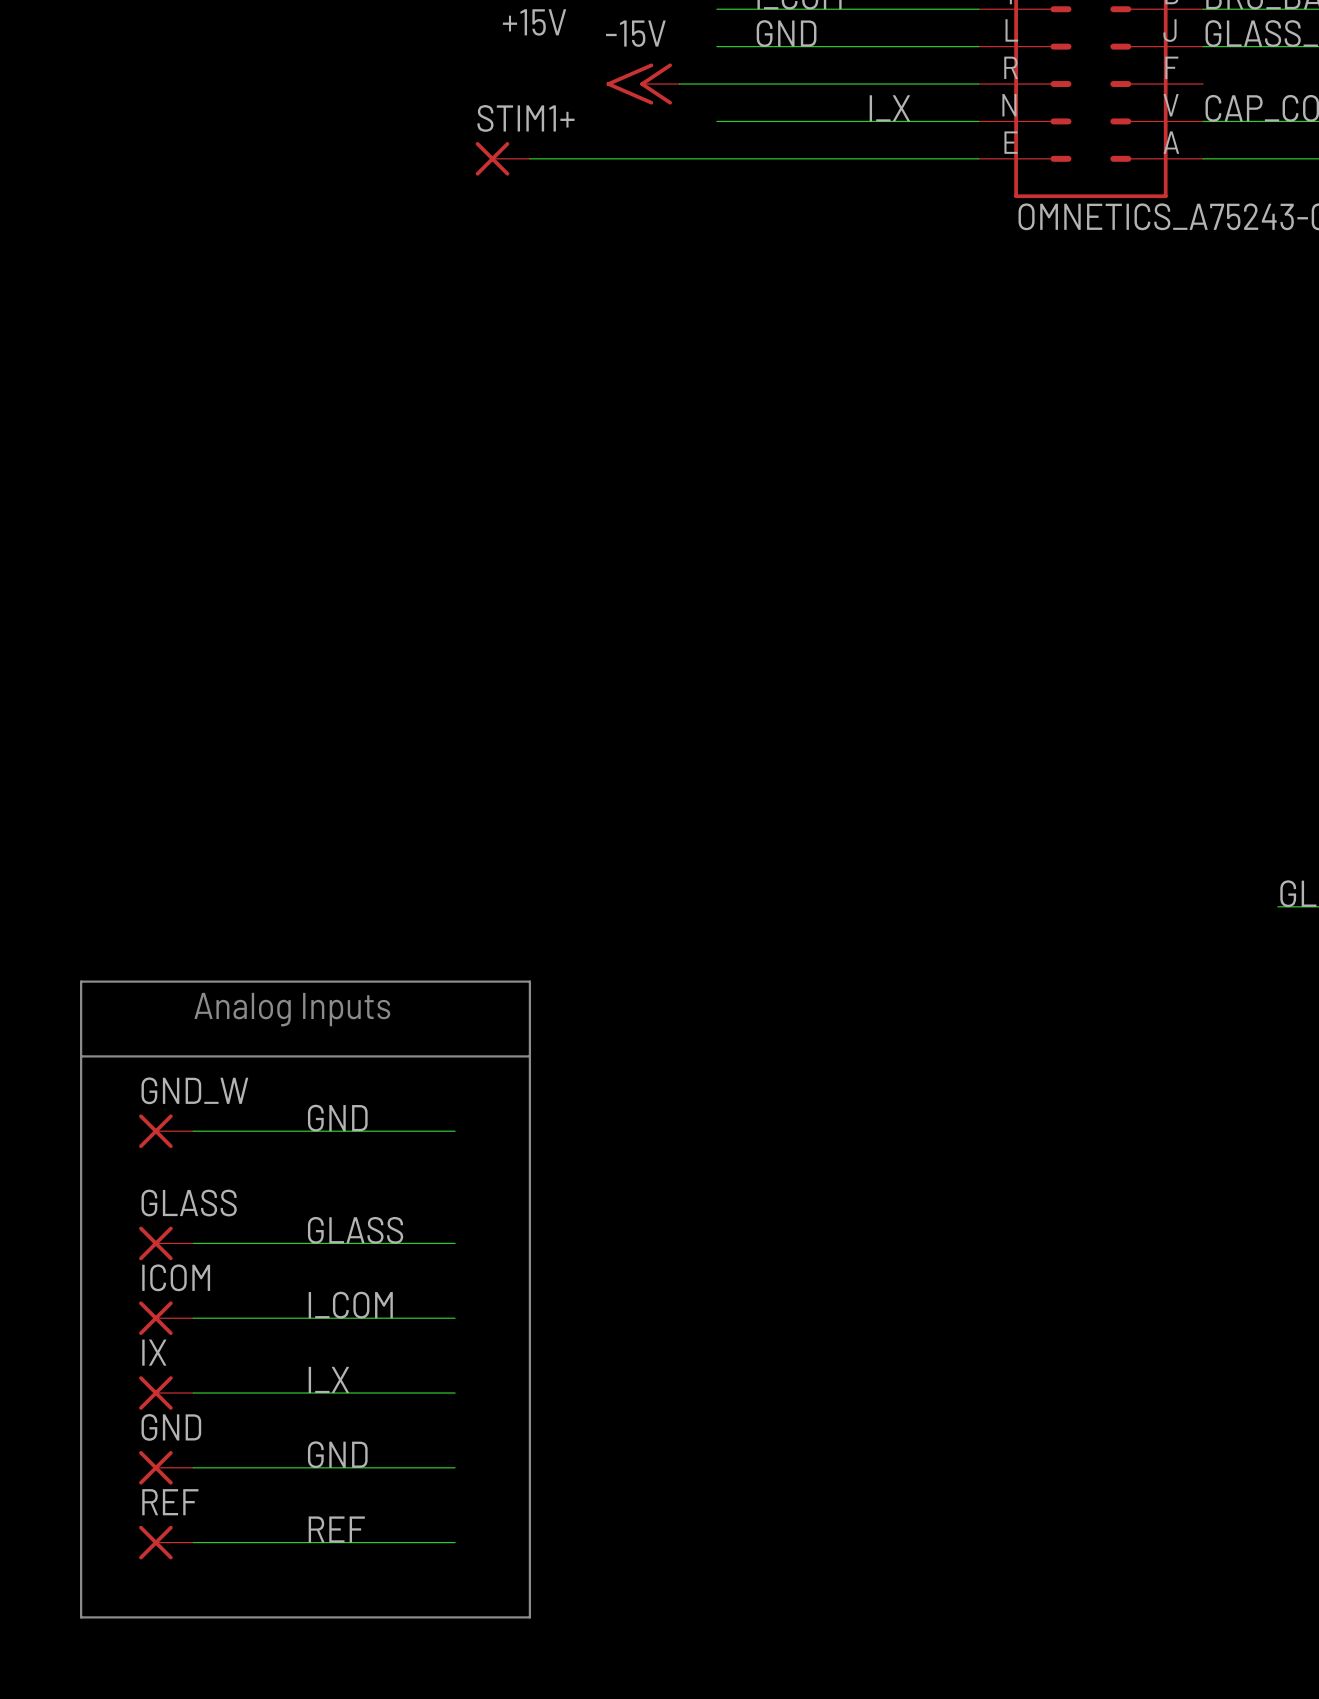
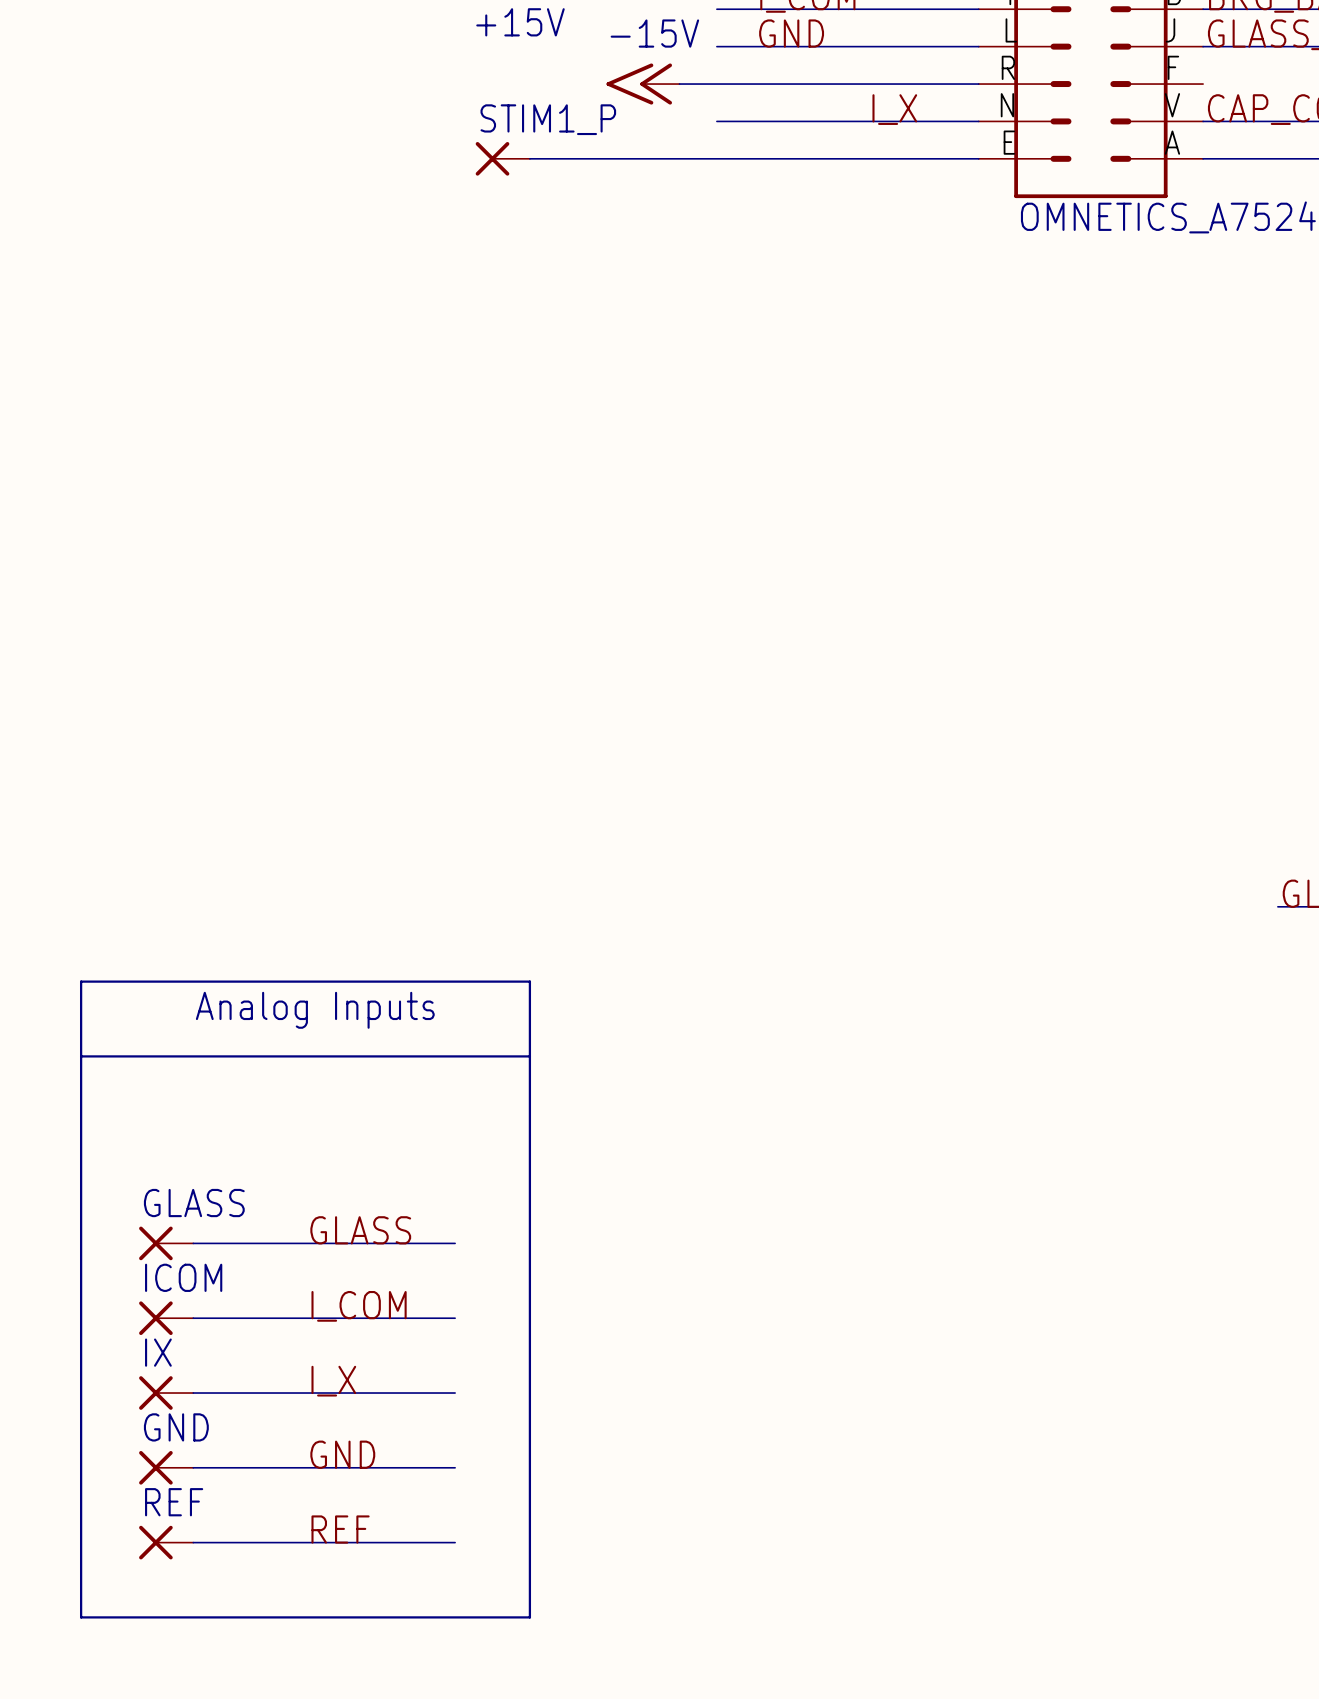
STIM1+ name: STIM1+ (526, 118) -> STIM1_P (548, 119)
label: GND (337, 1118) -> none
GND_W: (166, 1131) -> none
wire: (193, 1131) (455, 1131) -> none

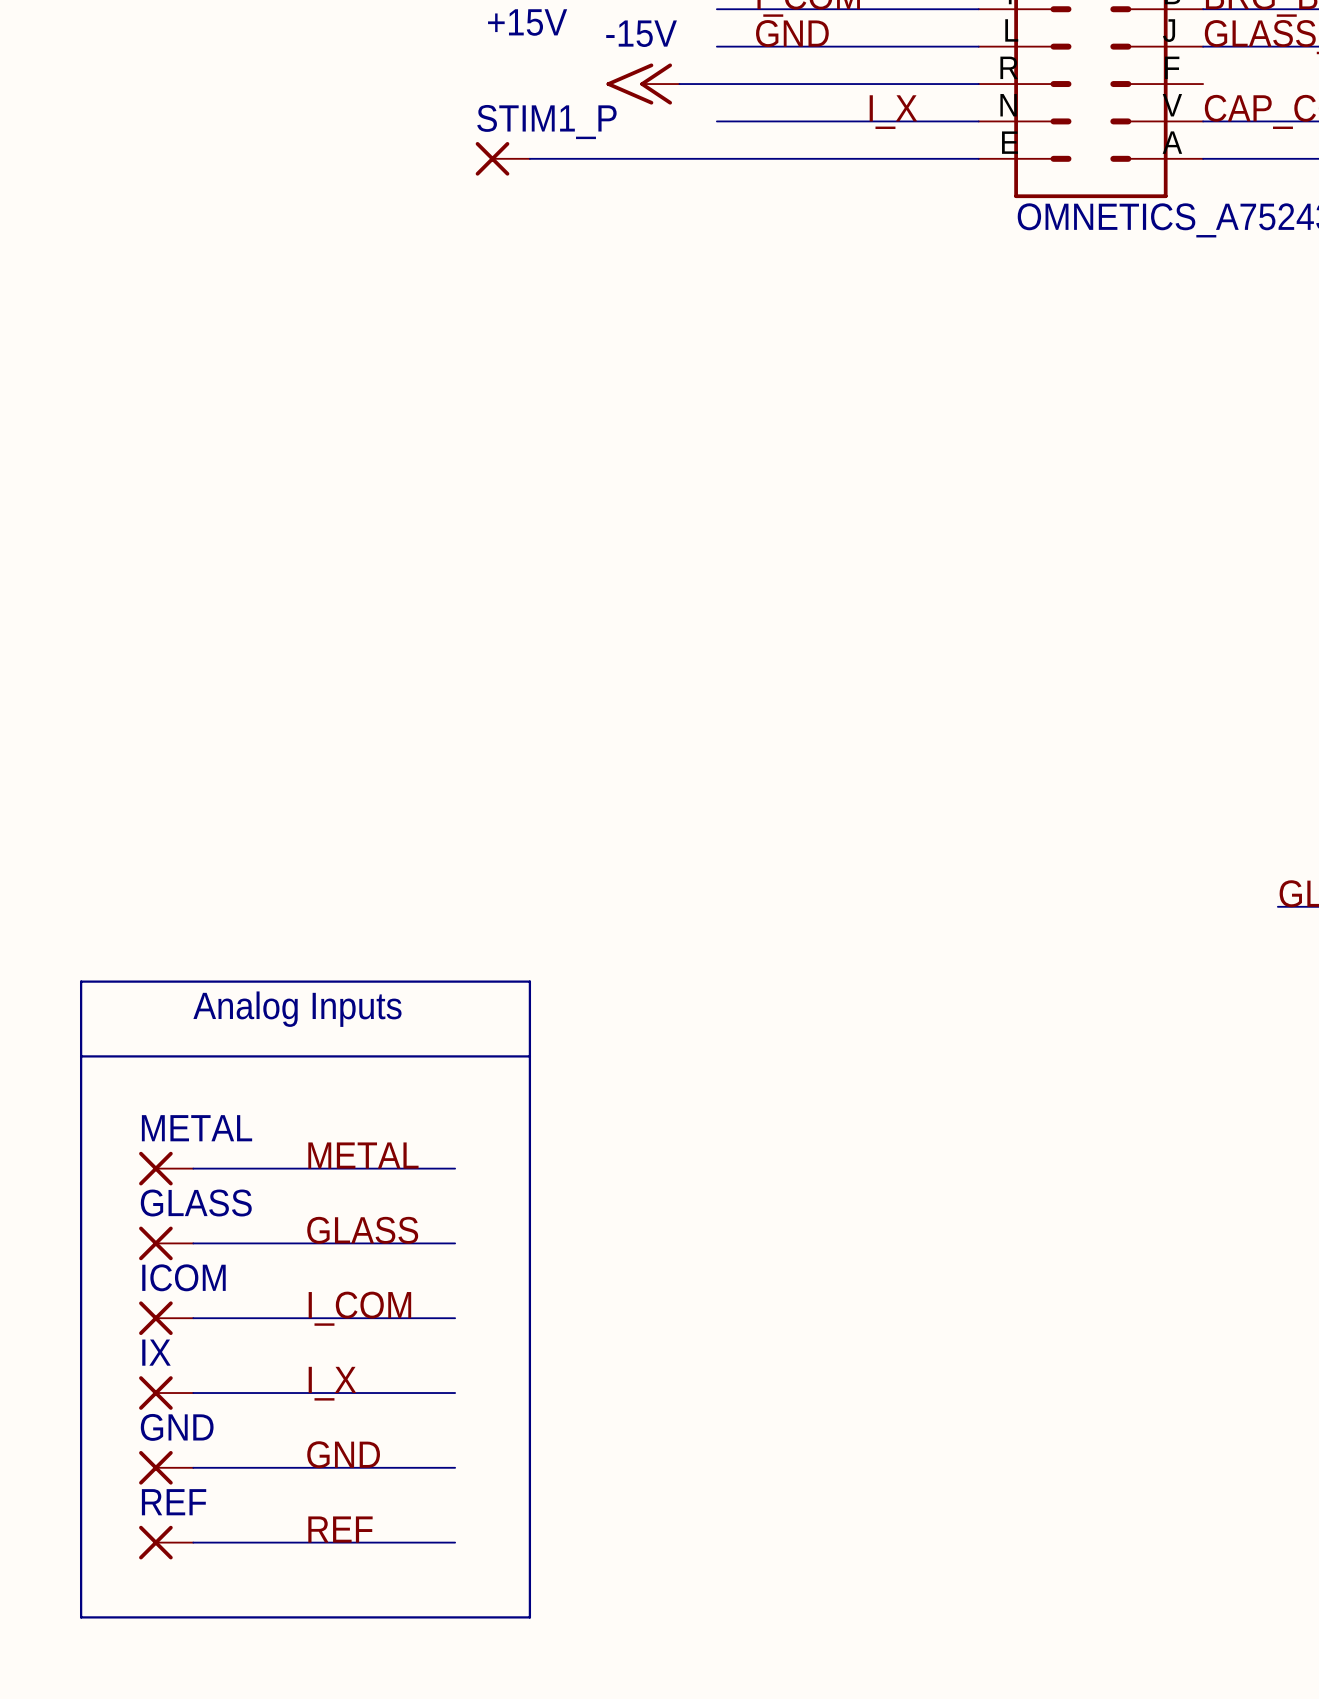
label: none -> METAL (363, 1155)
METAL: none -> (166, 1168)
wire: none -> (193, 1168) (455, 1168)

